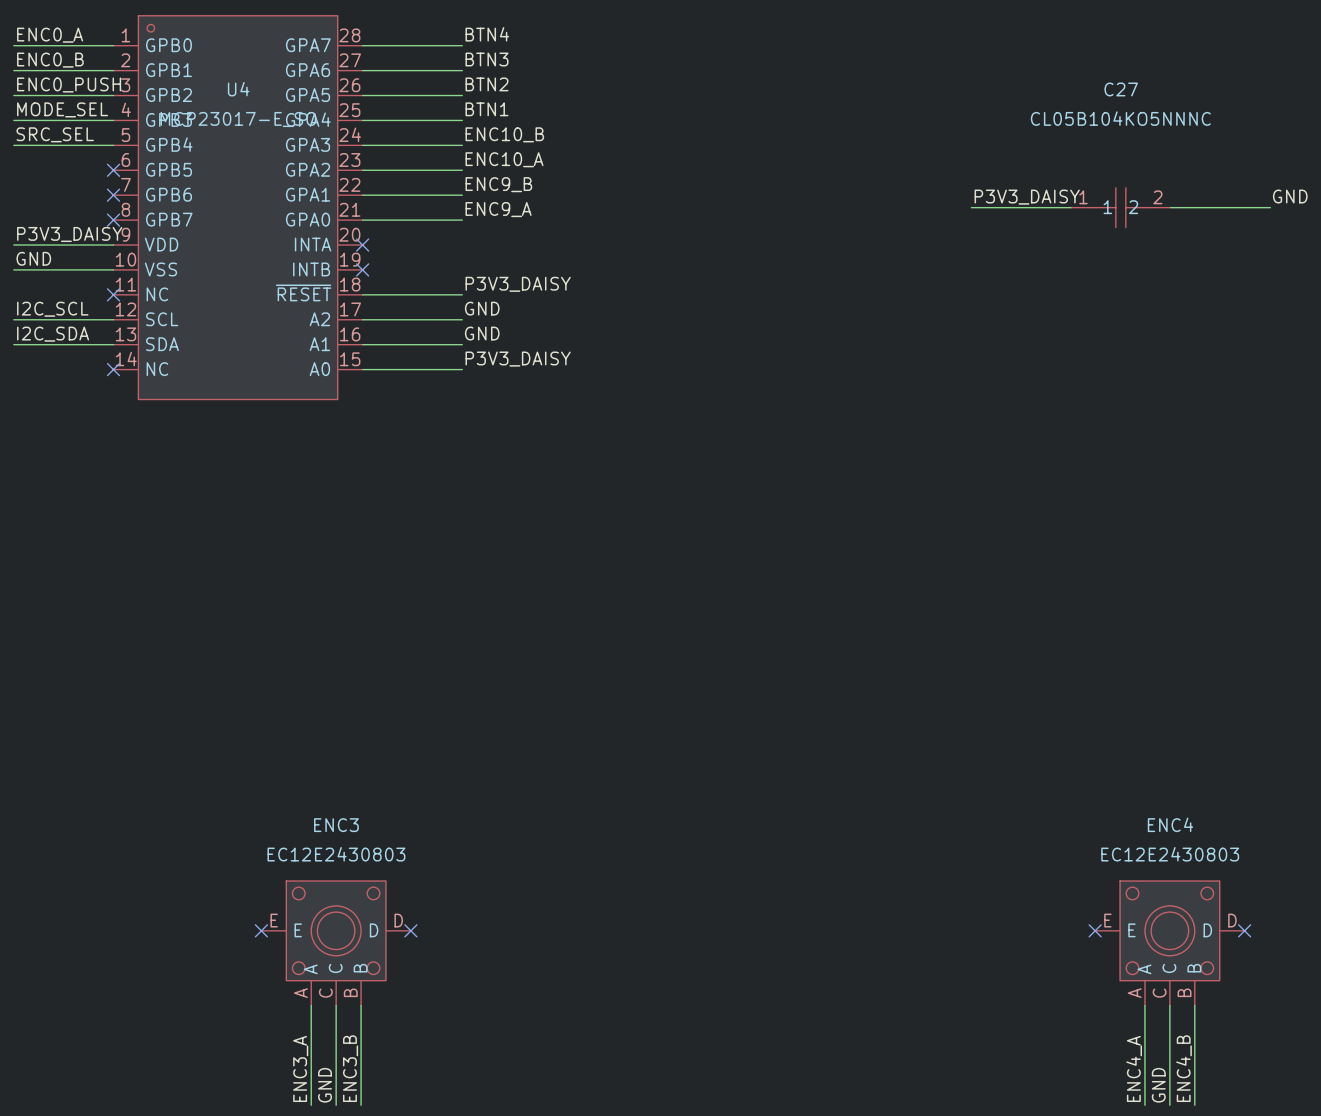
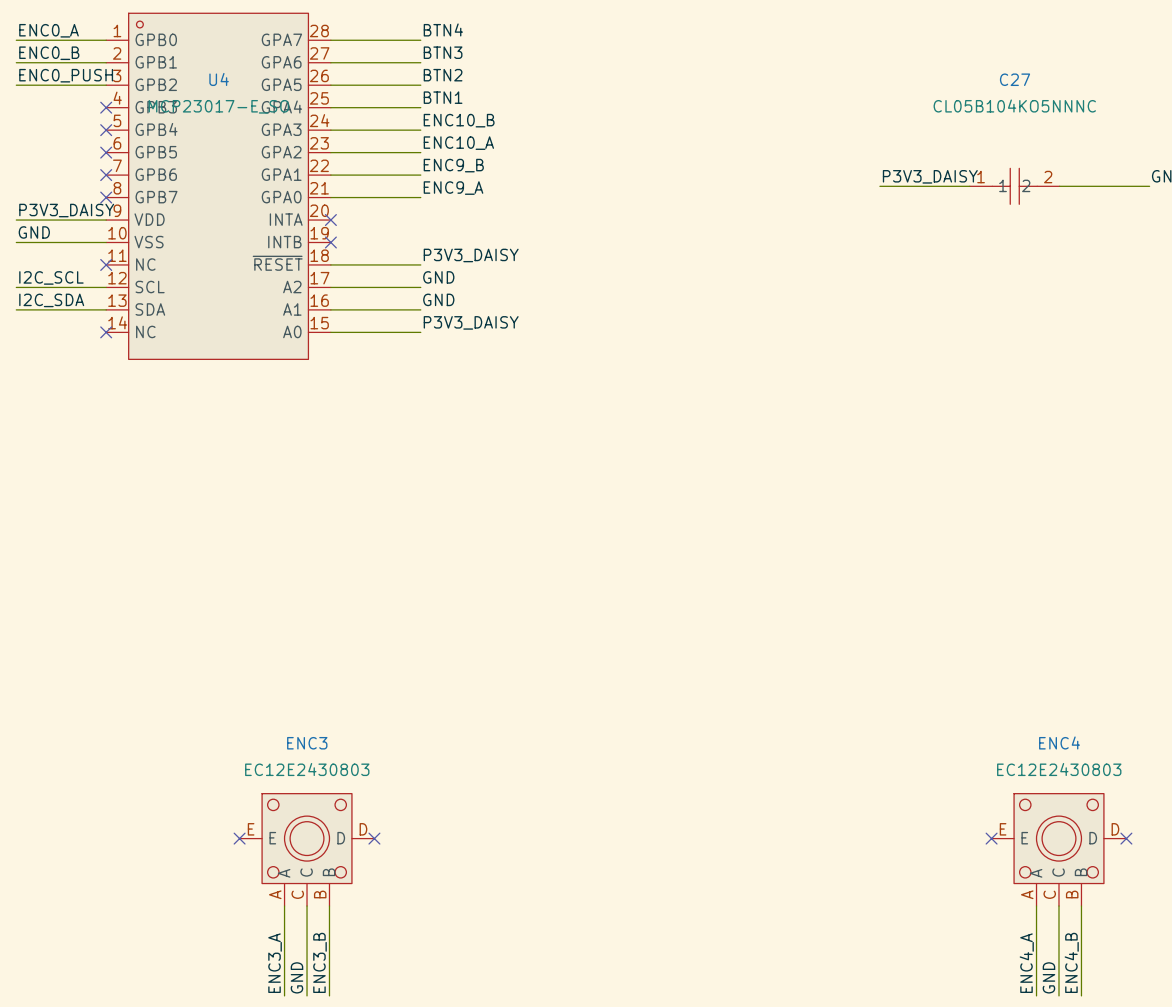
label: MODE_SEL (62, 109) -> none
wire: (13, 120) (113, 120) -> none
no-connect mark: none -> (106, 107)
label: SRC_SEL (55, 134) -> none
wire: (13, 145) (113, 145) -> none
no-connect mark: none -> (106, 130)

